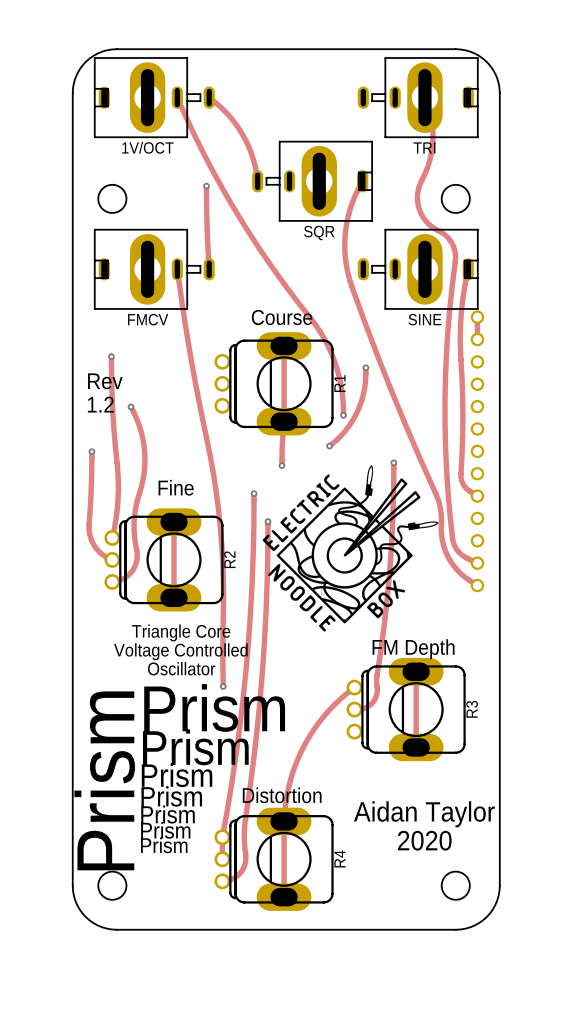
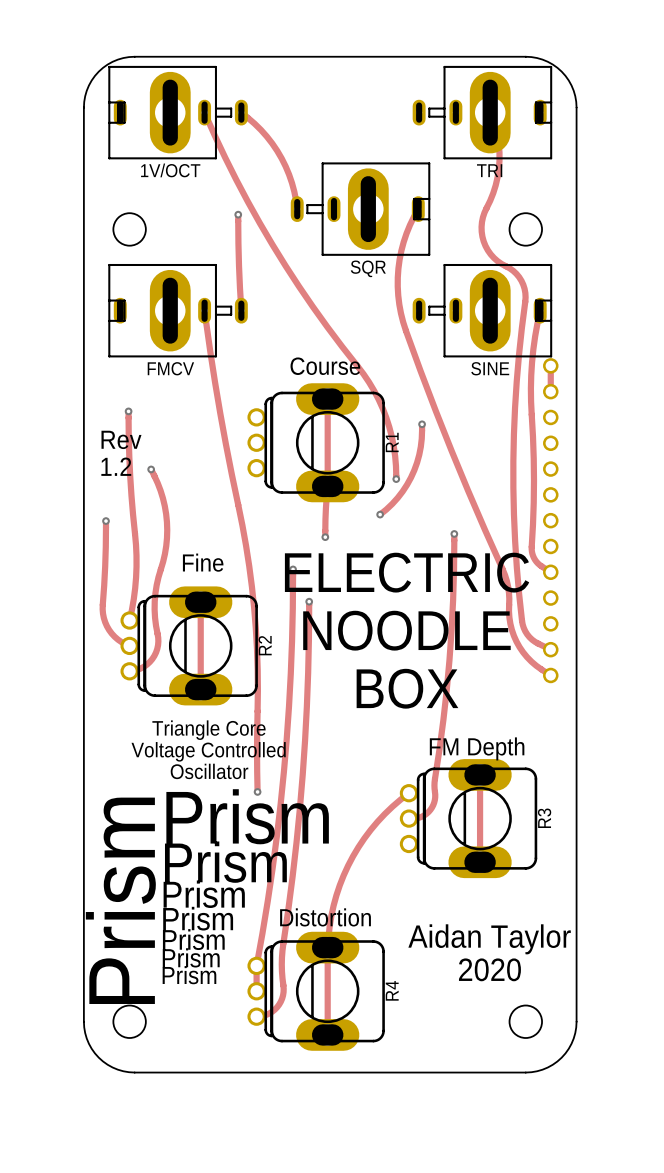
drawing: [262, 465, 439, 632] -> none
text: none -> ELECTRIC (407, 572)
text: none -> NOODLE (406, 630)
text: none -> BOX (407, 688)

